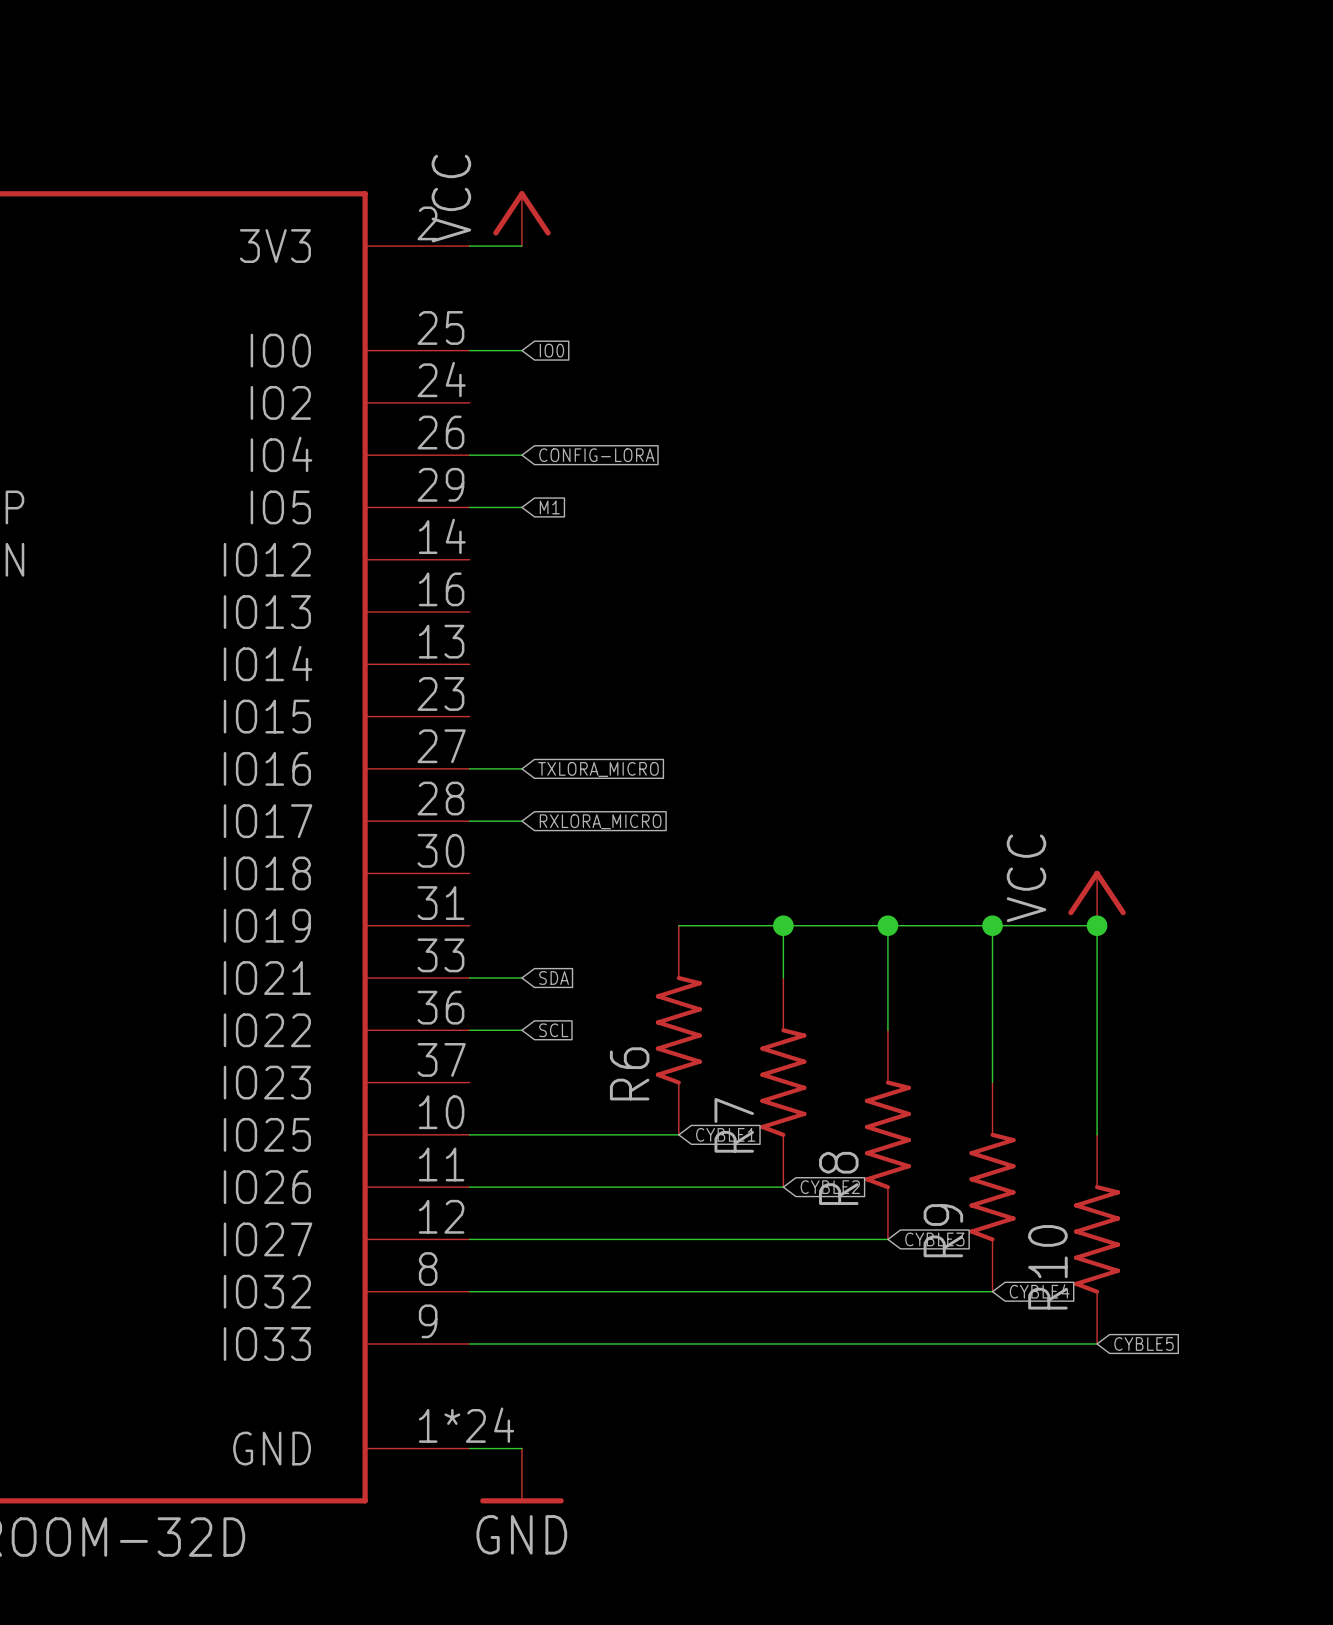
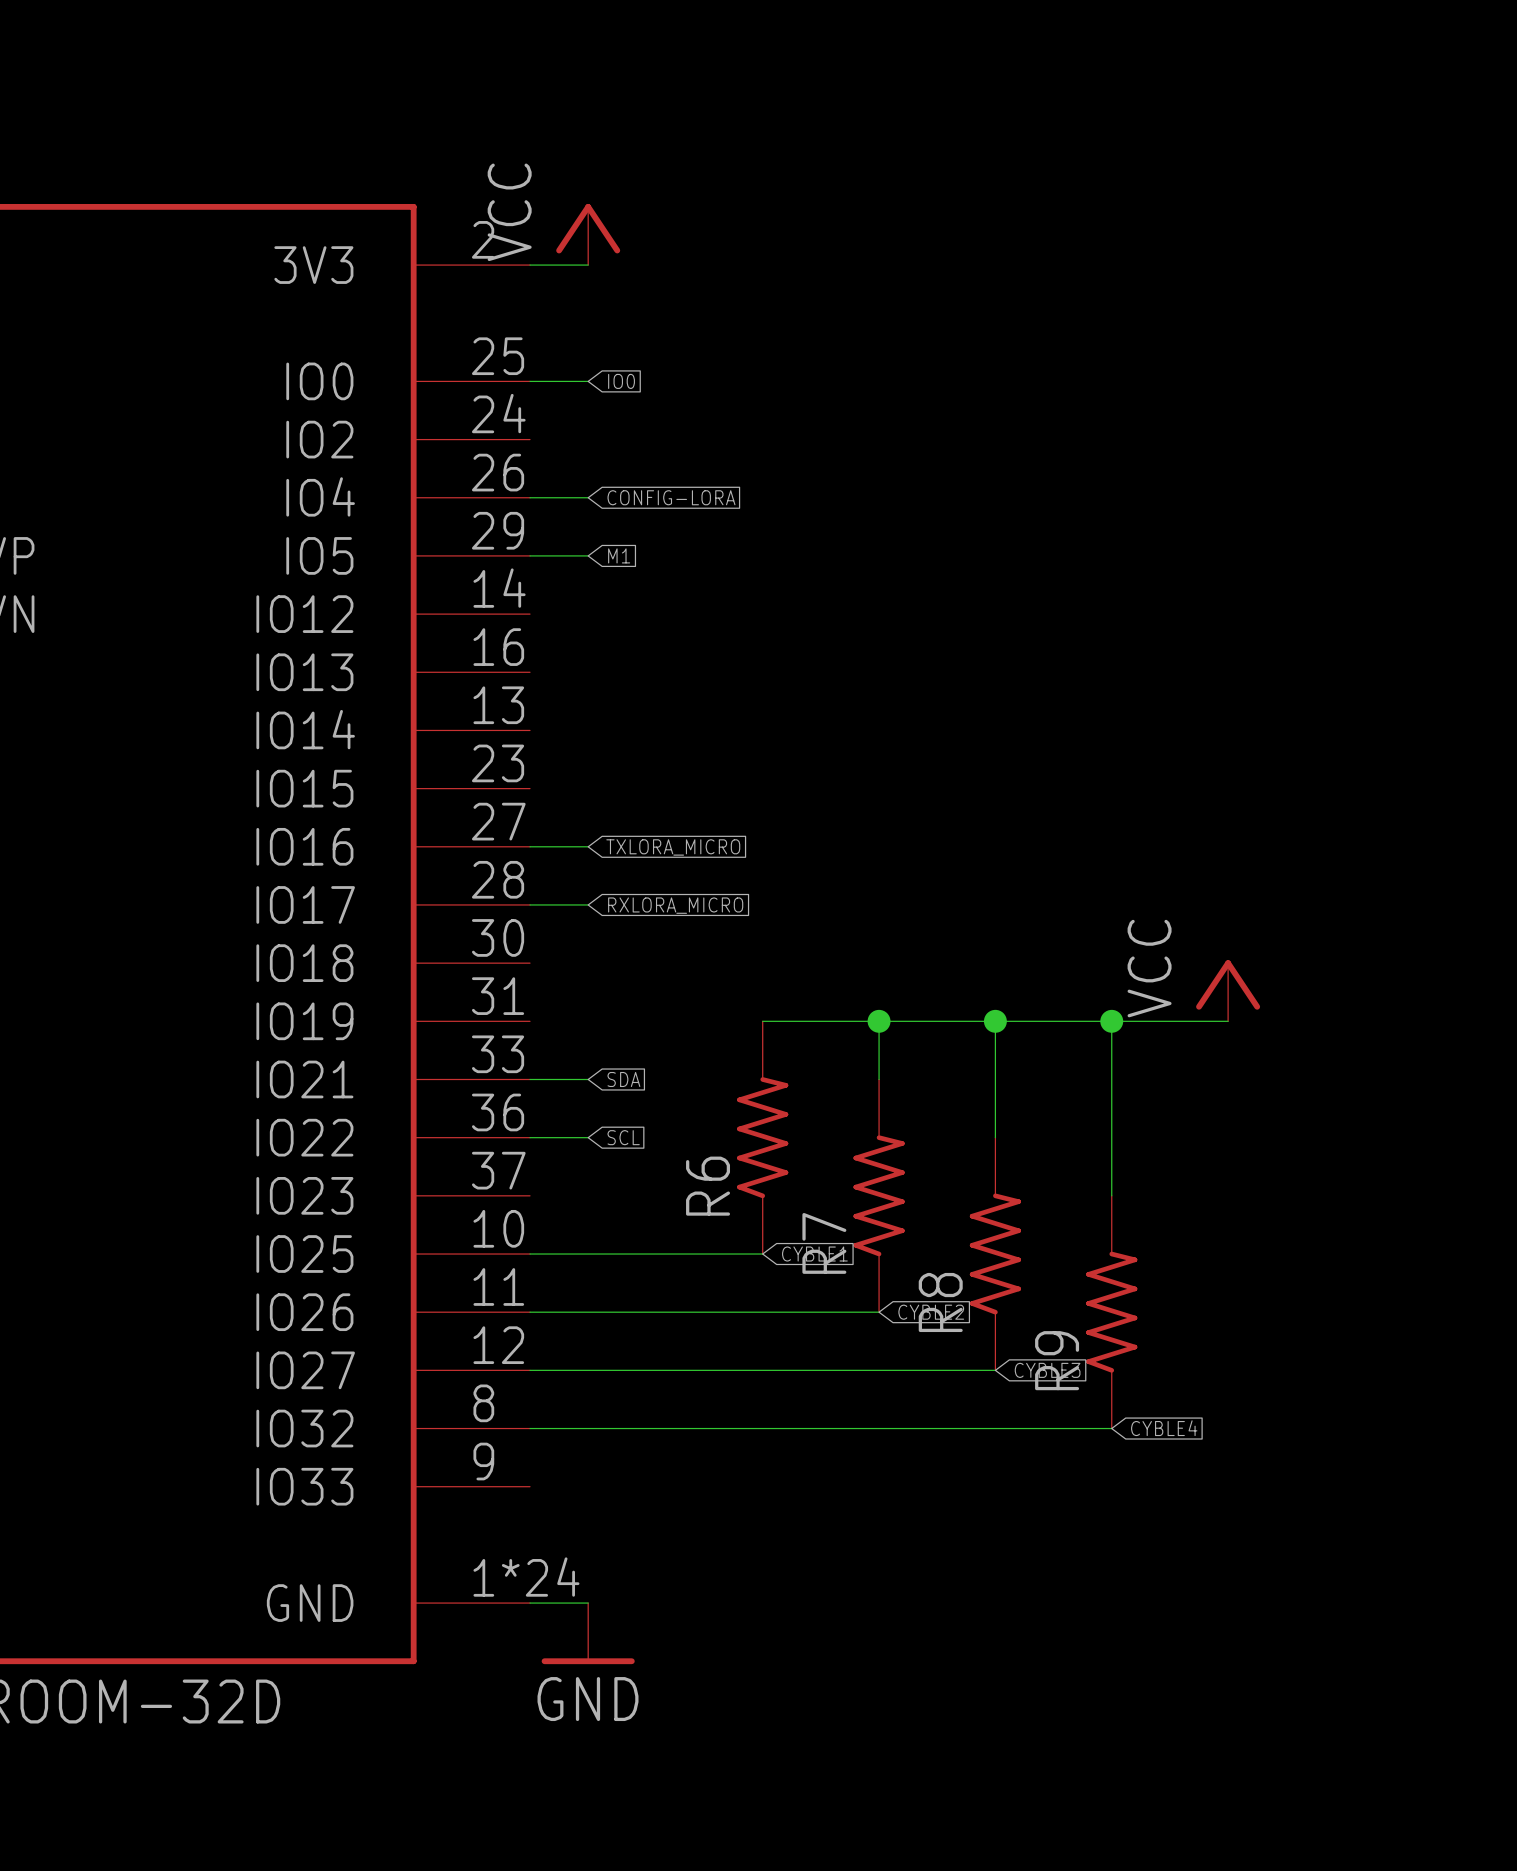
wire: (1097, 925) (1097, 1134) -> none
junction: (1097, 925) -> none
R10: (1097, 1239) -> none
wire: (469, 1343) (1097, 1343) -> none
global label: CYBLE5 (1143, 1343) -> none

